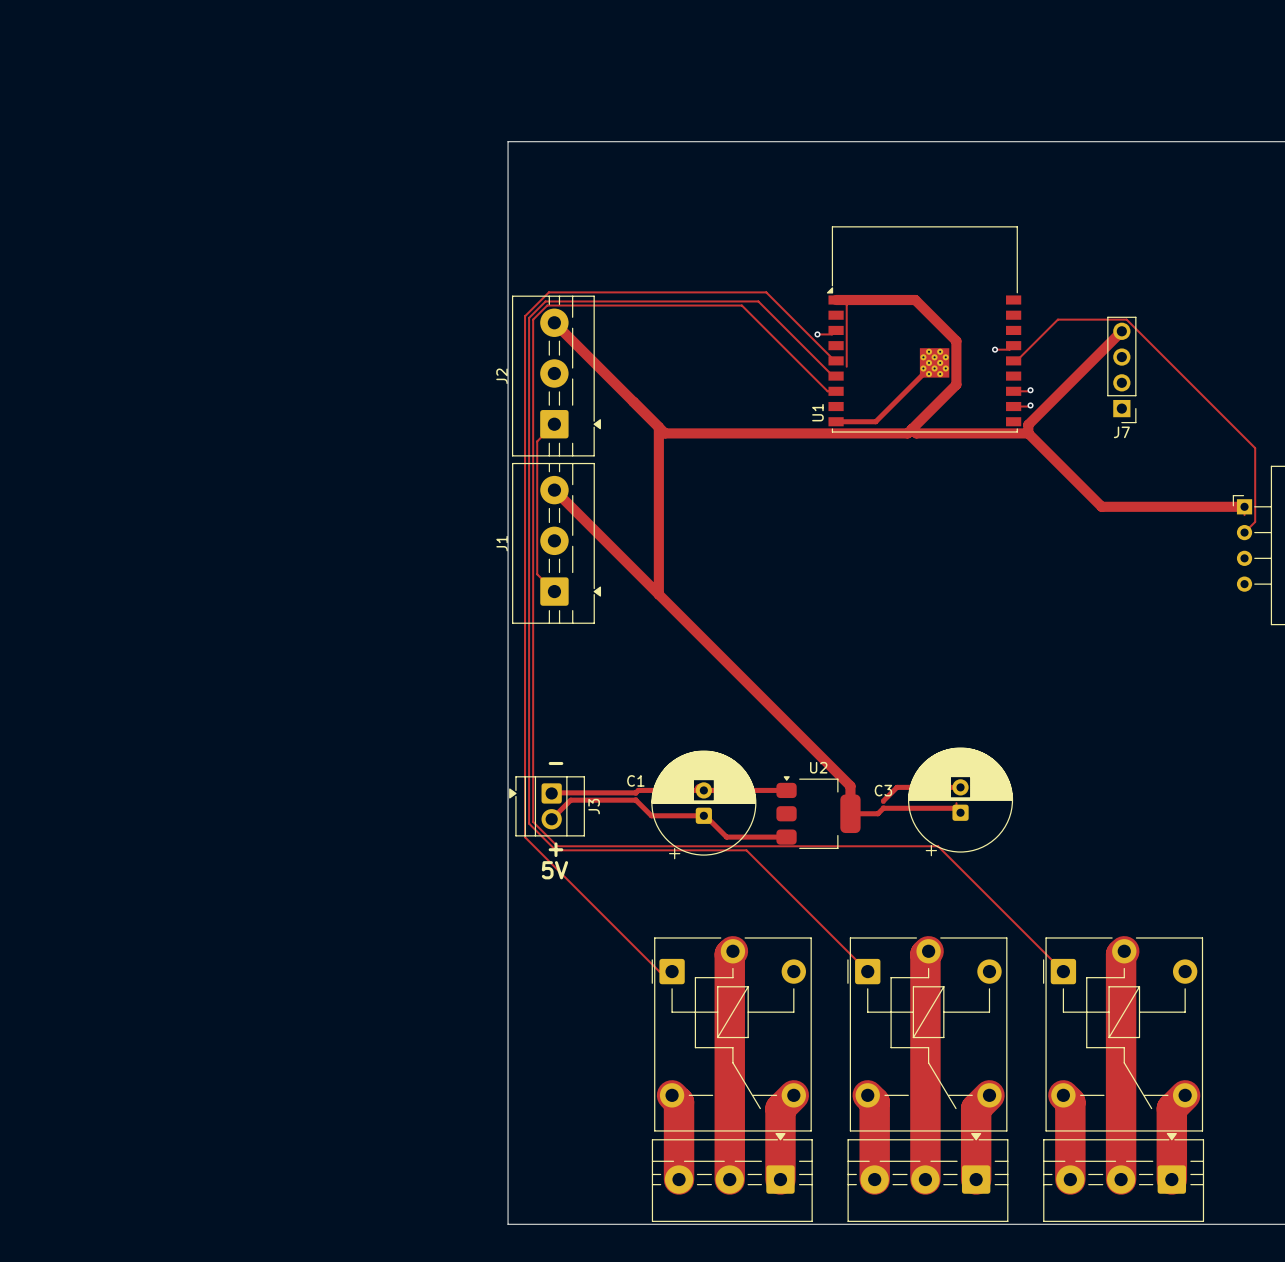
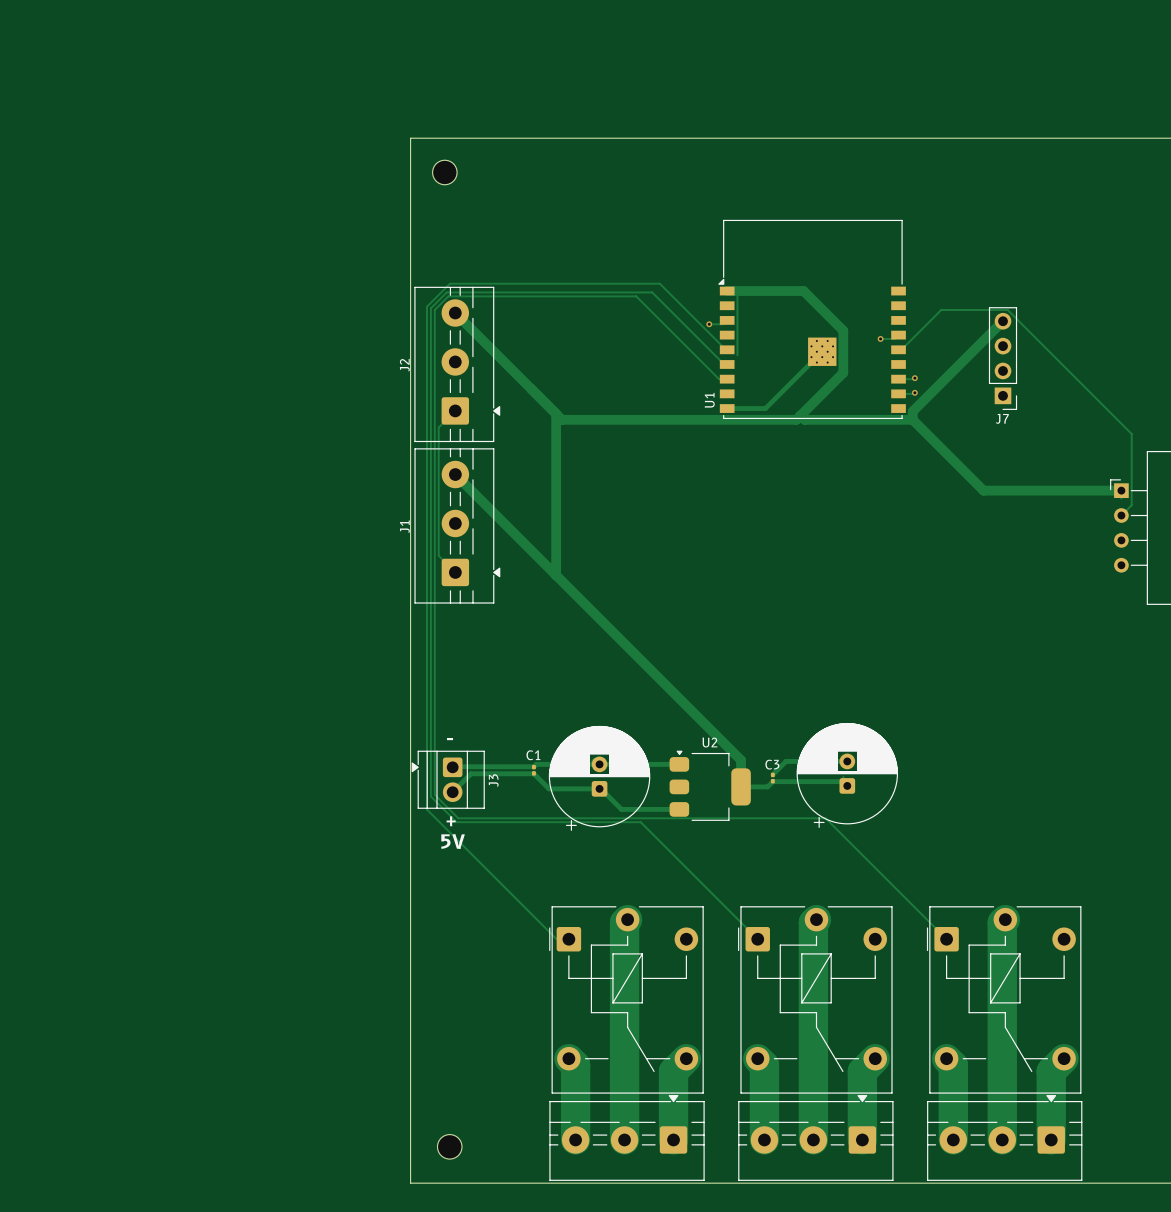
part: none -> (444, 172)
part: none -> (449, 1146)

